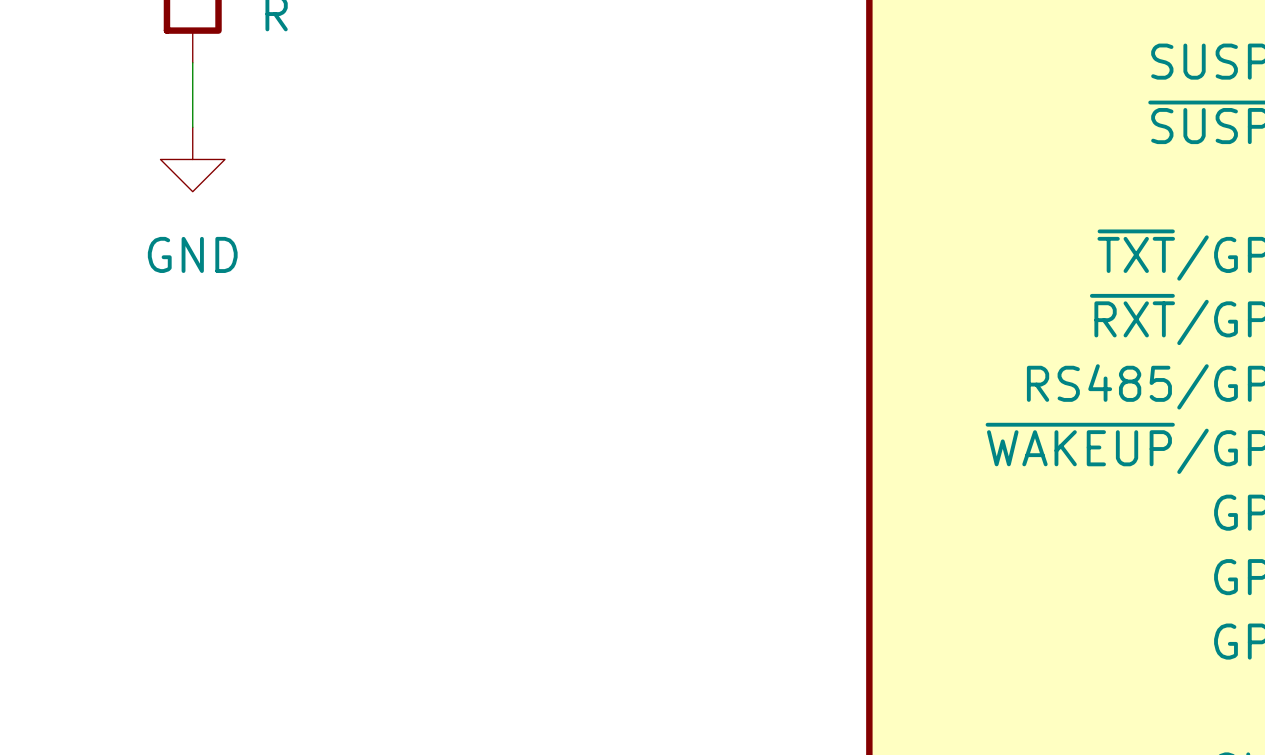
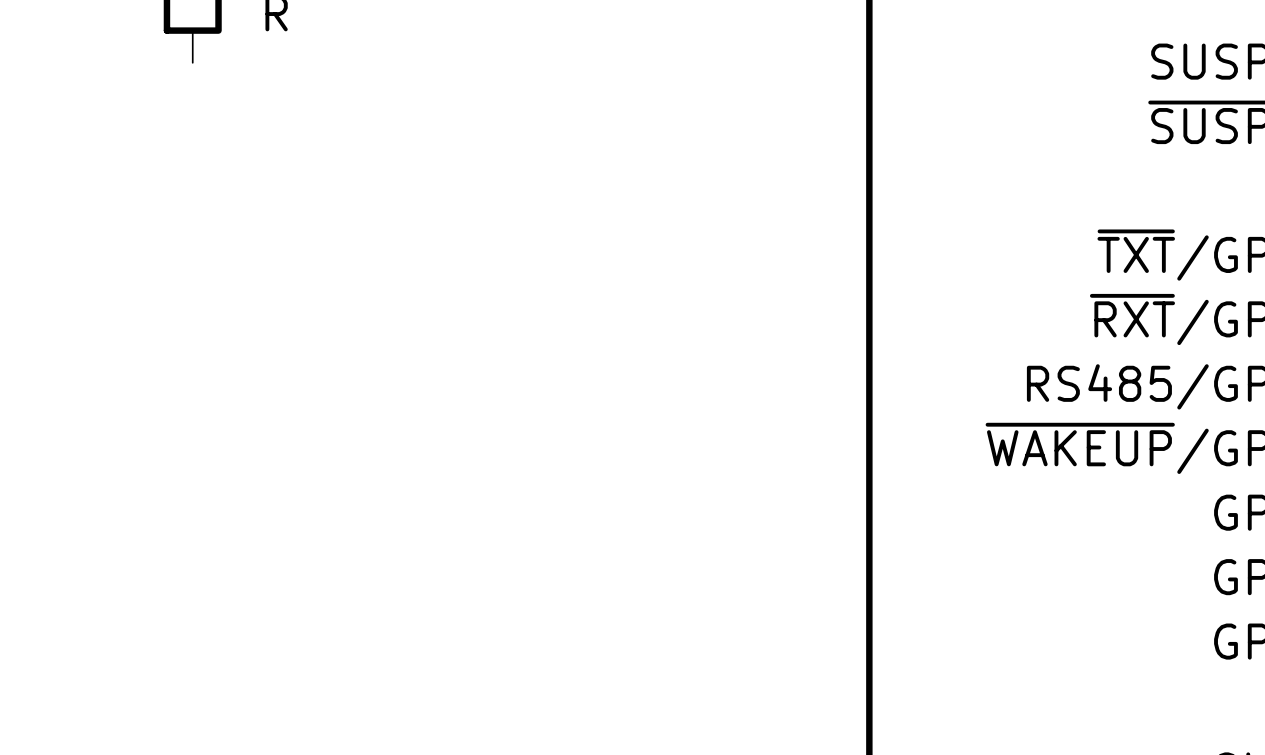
wire: (192, 62) (192, 127) -> none
power symbol: GND (192, 159) -> none

